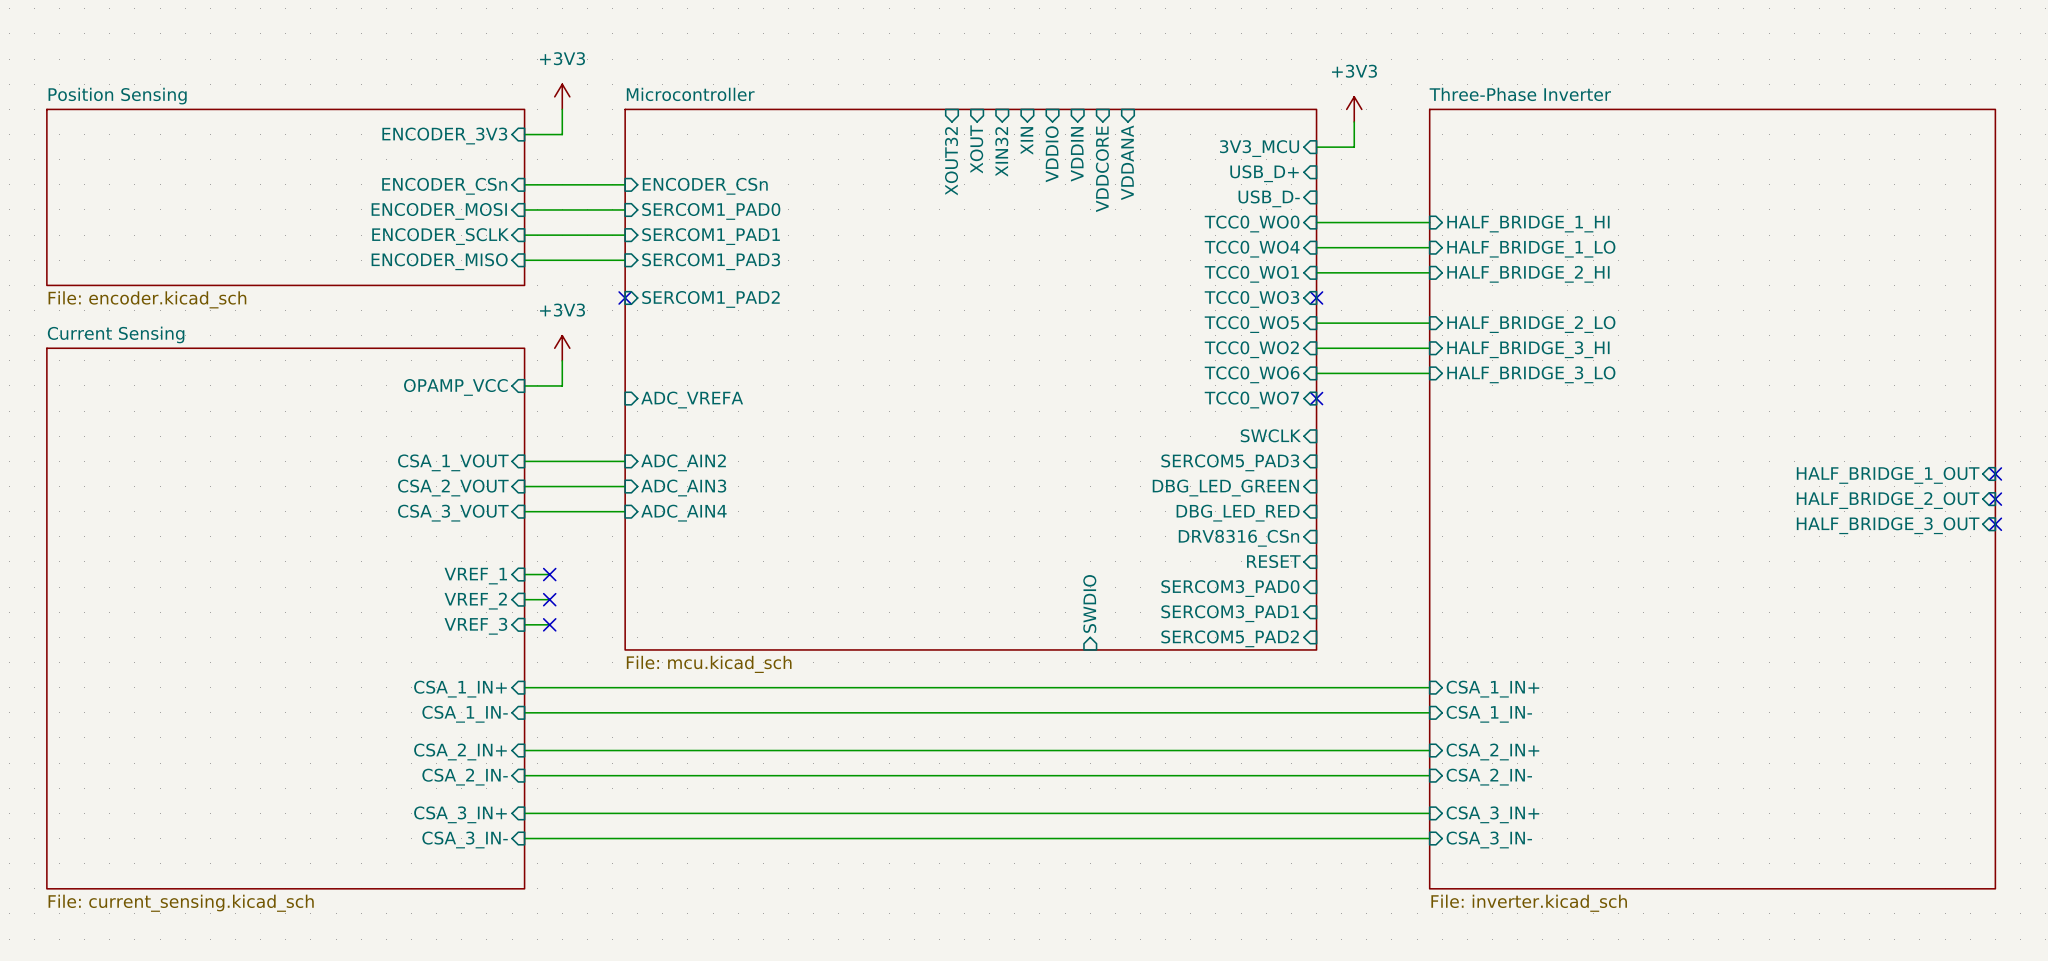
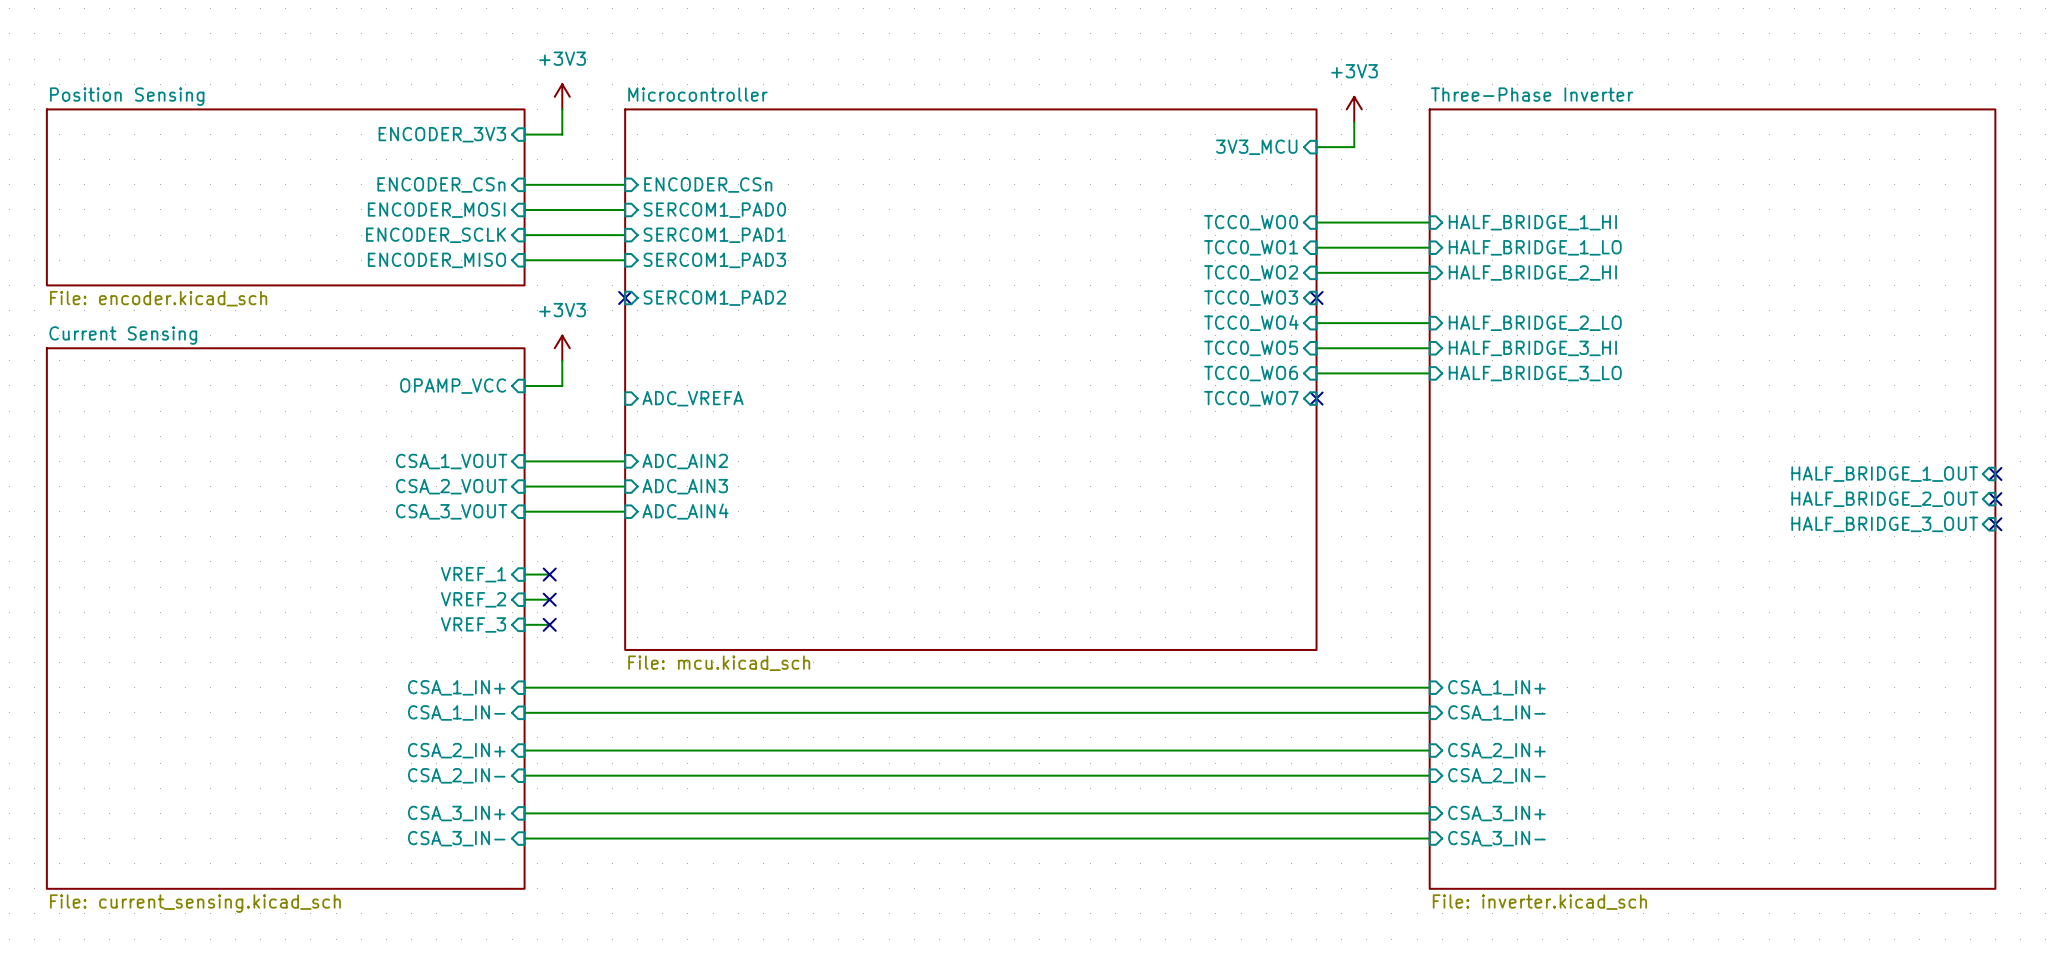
sheet pin: XIN (1026, 140) -> none
sheet pin: XOUT (976, 149) -> none
sheet pin: XIN32 (1001, 151) -> none
sheet pin: VDDIO (1052, 154) -> none
sheet pin: VDDIN (1077, 154) -> none
sheet pin: XOUT32 (951, 161) -> none
sheet pin: VDDANA (1127, 162) -> none
sheet pin: VDDCORE (1102, 169) -> none
sheet pin: USB_D+ (1264, 173) -> none
sheet pin: USB_D- (1269, 198) -> none
sheet pin: TCC0_WO4 (1252, 249) -> TCC0_WO1 (1251, 247)
sheet pin: TCC0_WO1 (1251, 274) -> TCC0_WO2 (1251, 272)
sheet pin: TCC0_WO5 (1251, 324) -> TCC0_WO4 (1251, 322)
sheet pin: TCC0_WO2 (1251, 349) -> TCC0_WO5 (1251, 348)
sheet pin: SWCLK (1270, 435) -> none
sheet pin: SERCOM5_PAD3 (1230, 462) -> none
sheet pin: DBG_LED_GREEN (1225, 488) -> none
sheet pin: DBG_LED_RED (1238, 513) -> none
sheet pin: DRV8316_CSn (1238, 538) -> none
sheet pin: RESET (1273, 561) -> none
sheet pin: SERCOM3_PAD0 (1230, 588) -> none
sheet pin: SWDIO (1089, 603) -> none
sheet pin: SERCOM3_PAD1 (1230, 613) -> none
sheet pin: SERCOM5_PAD2 (1230, 638) -> none

